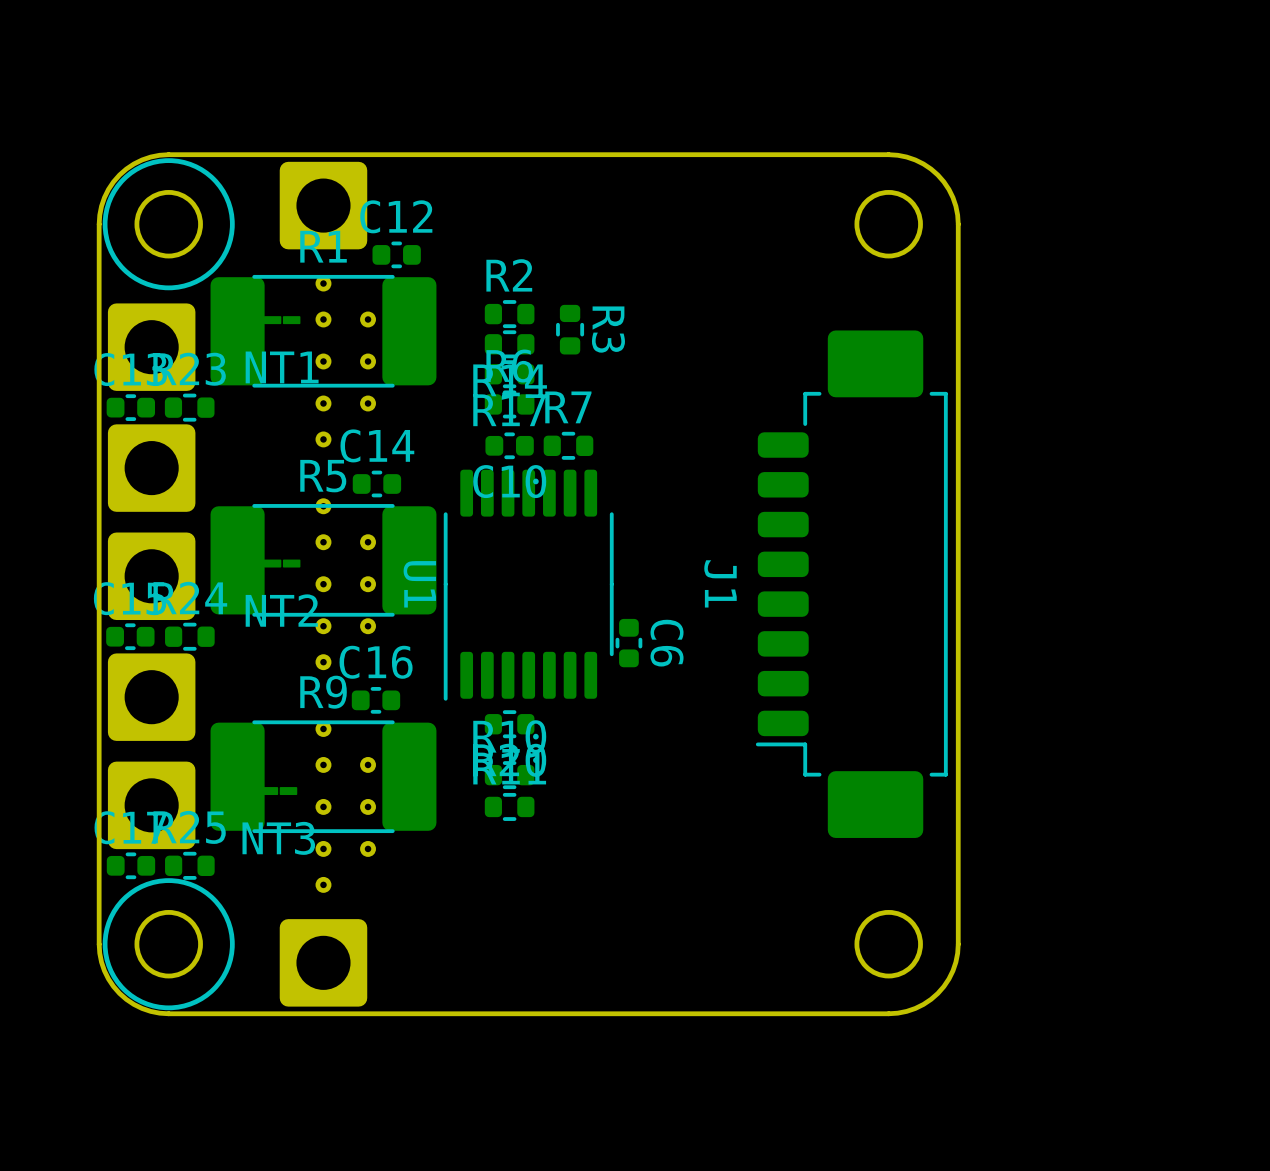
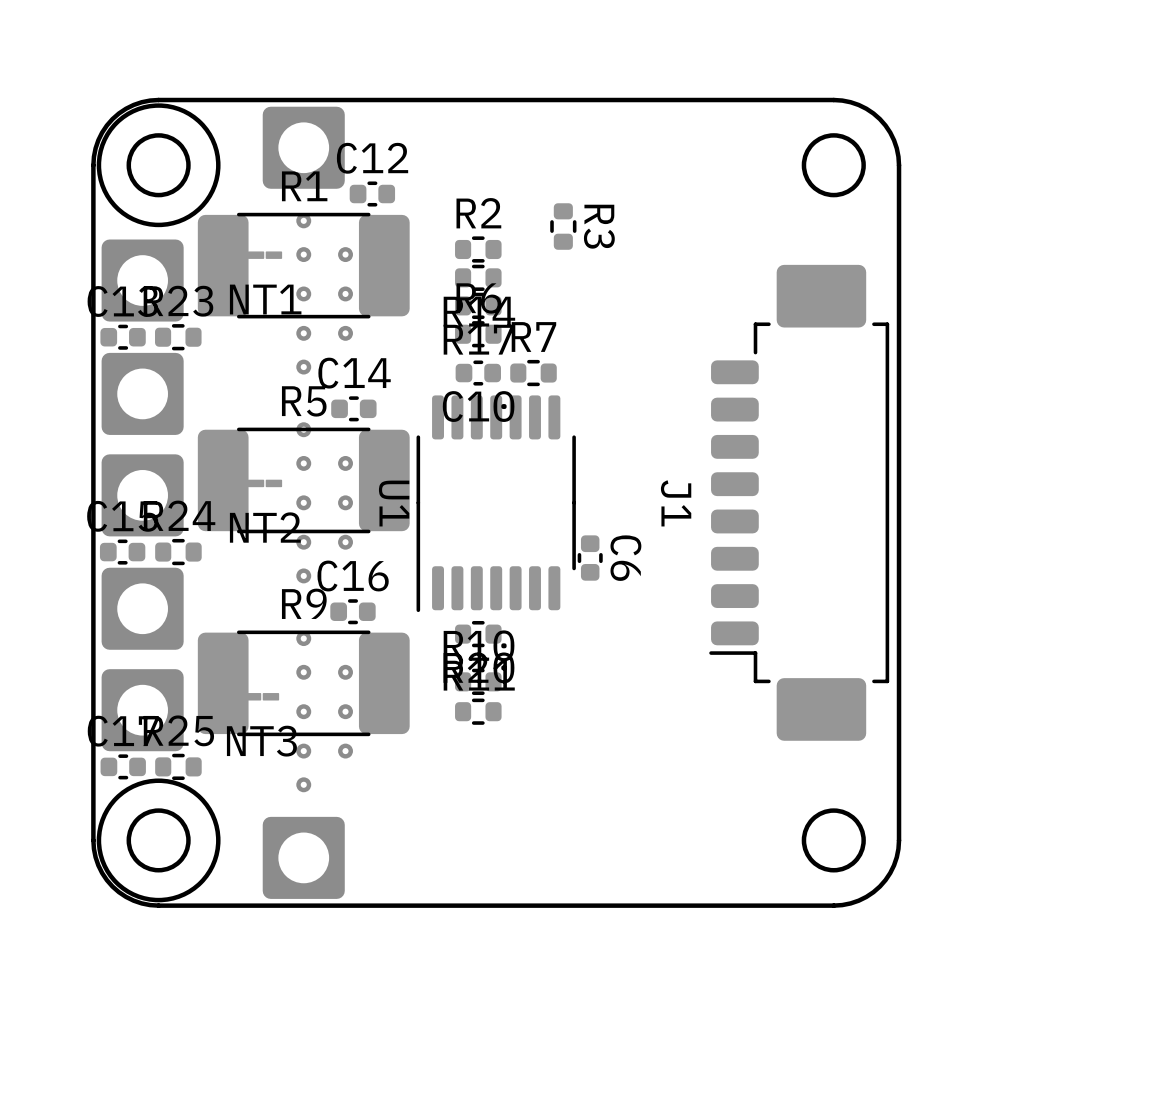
R3 position: (570, 329) -> (563, 226)

